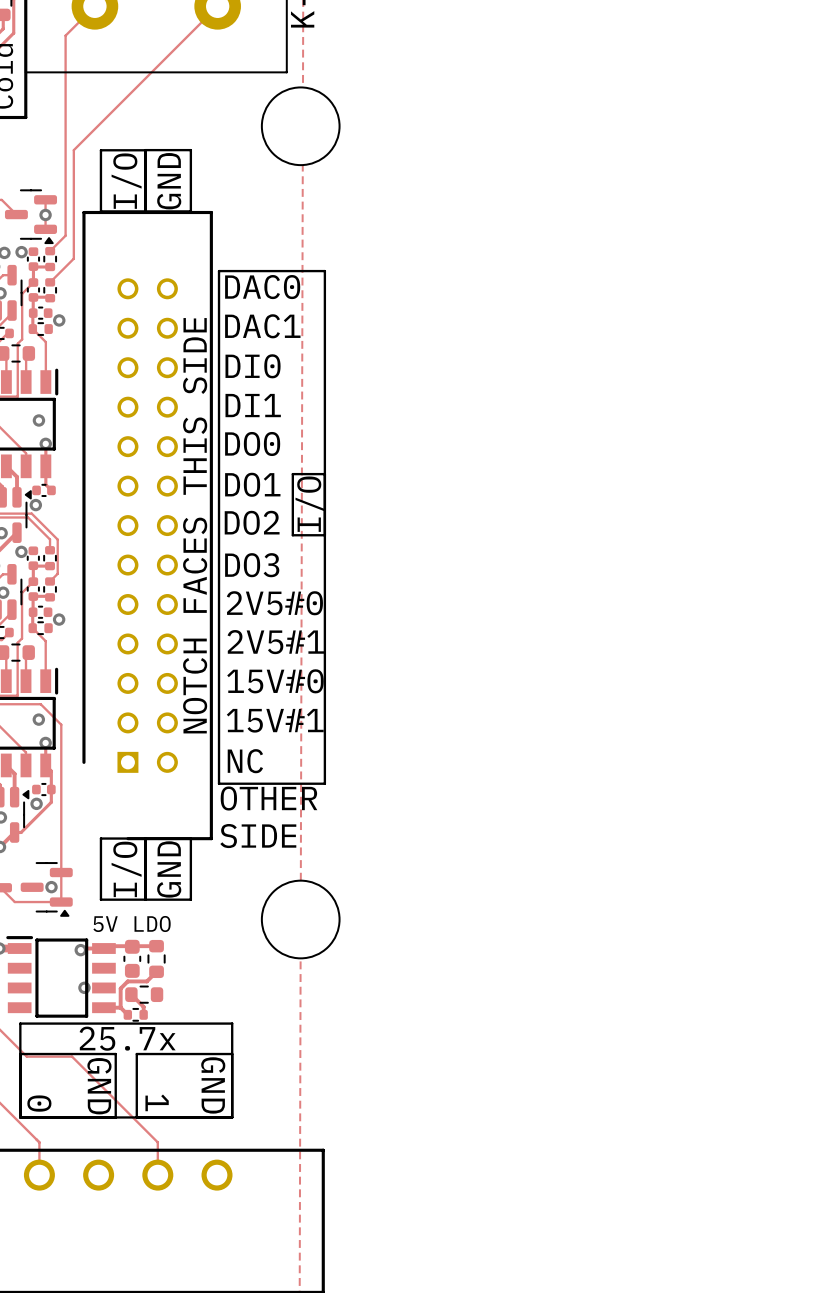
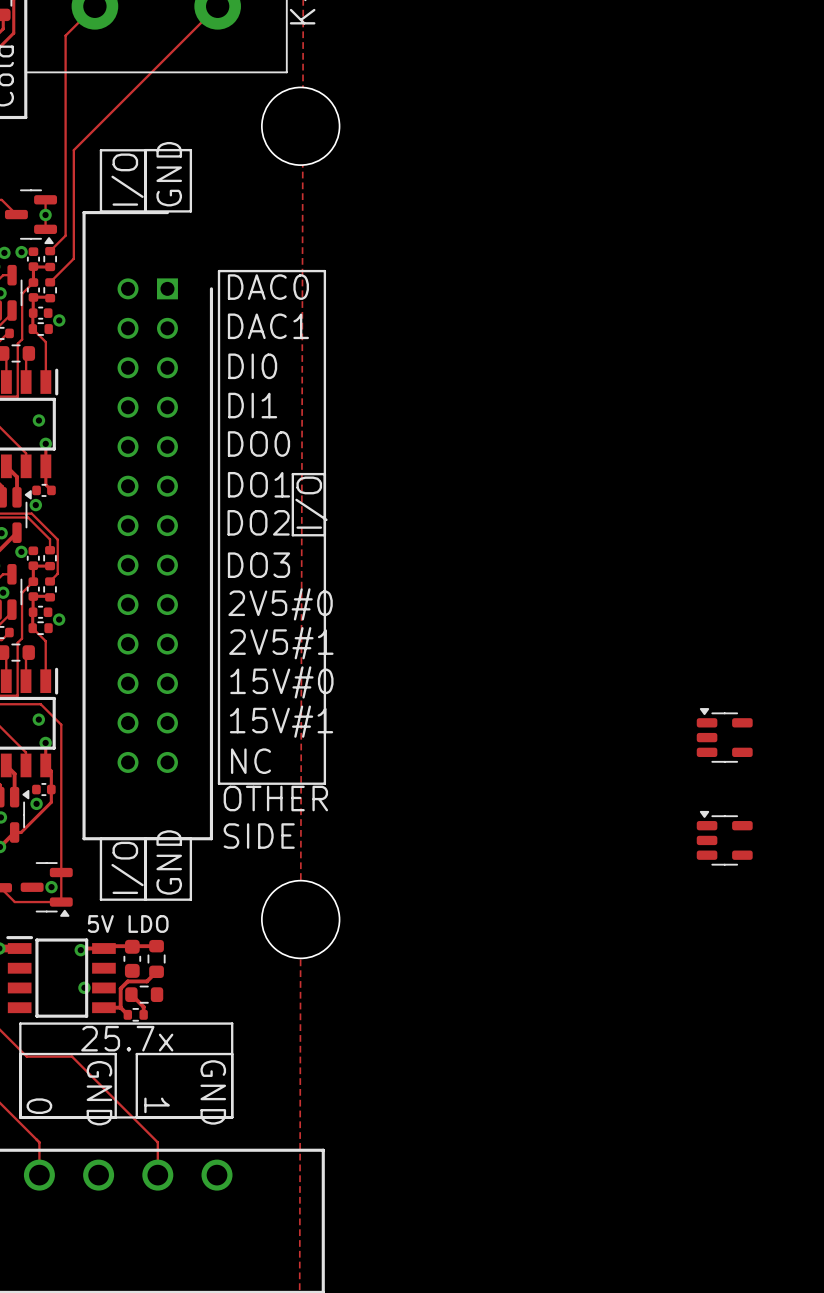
part rotation: 0° (147, 525) -> 180° (147, 525)
text: NOTCH FACES THIS SIDE (195, 525) -> none
part: none -> (724, 735)
part: none -> (724, 838)

